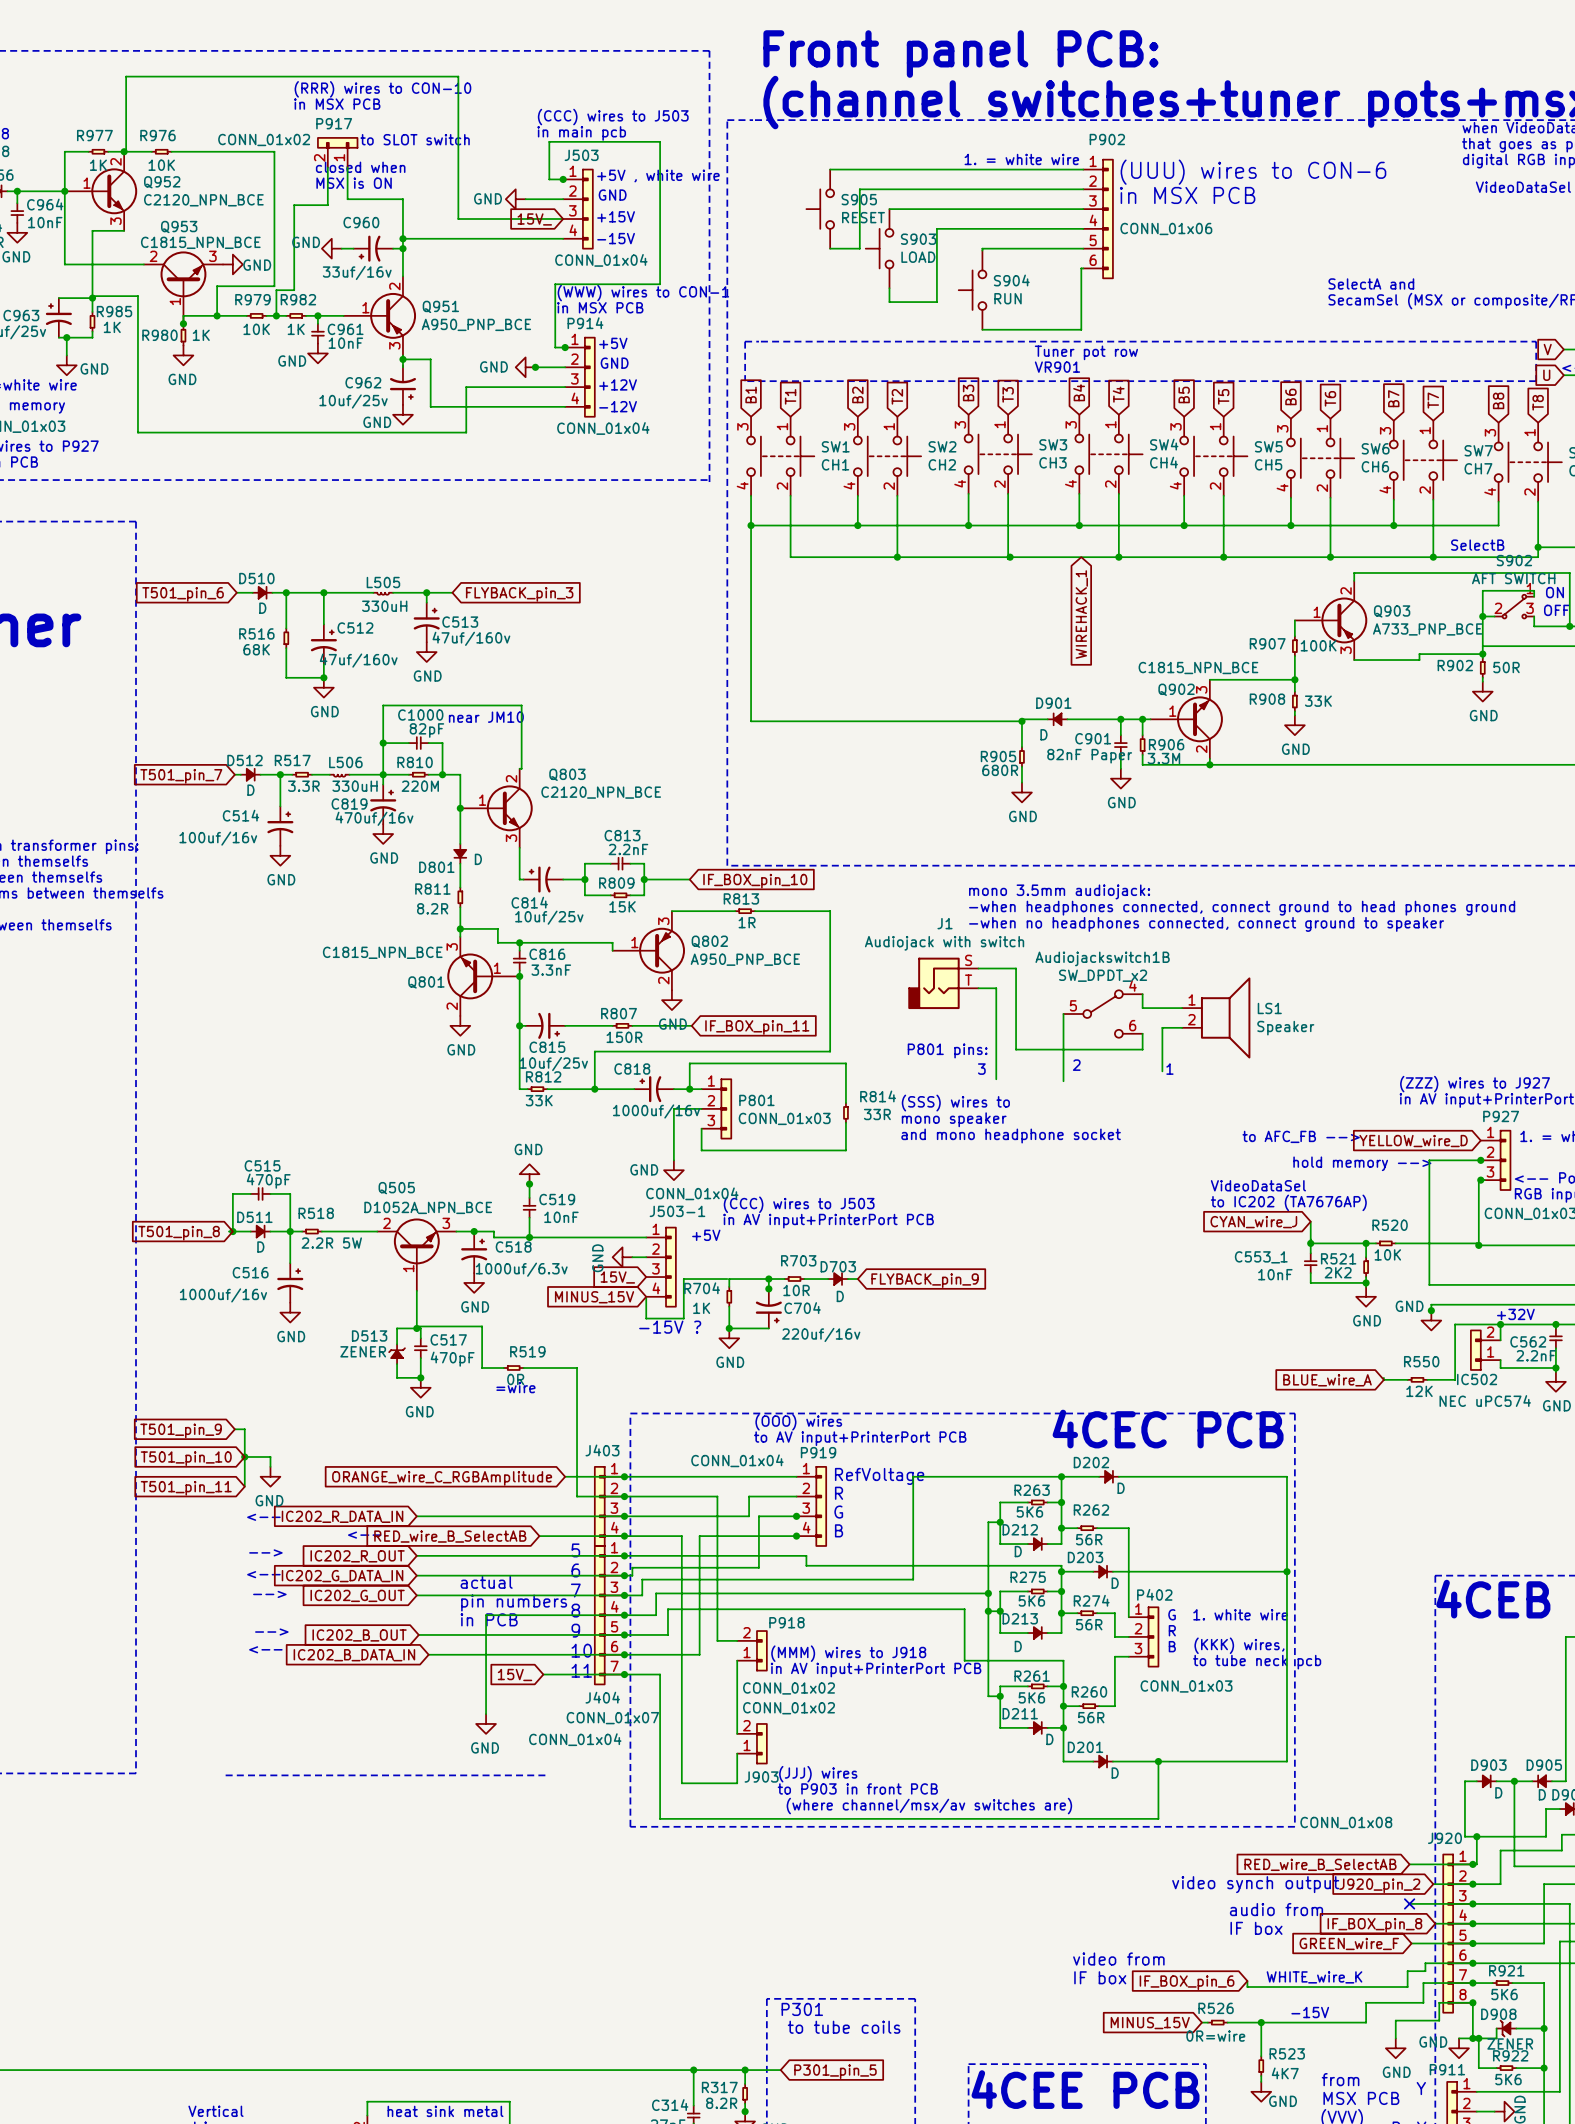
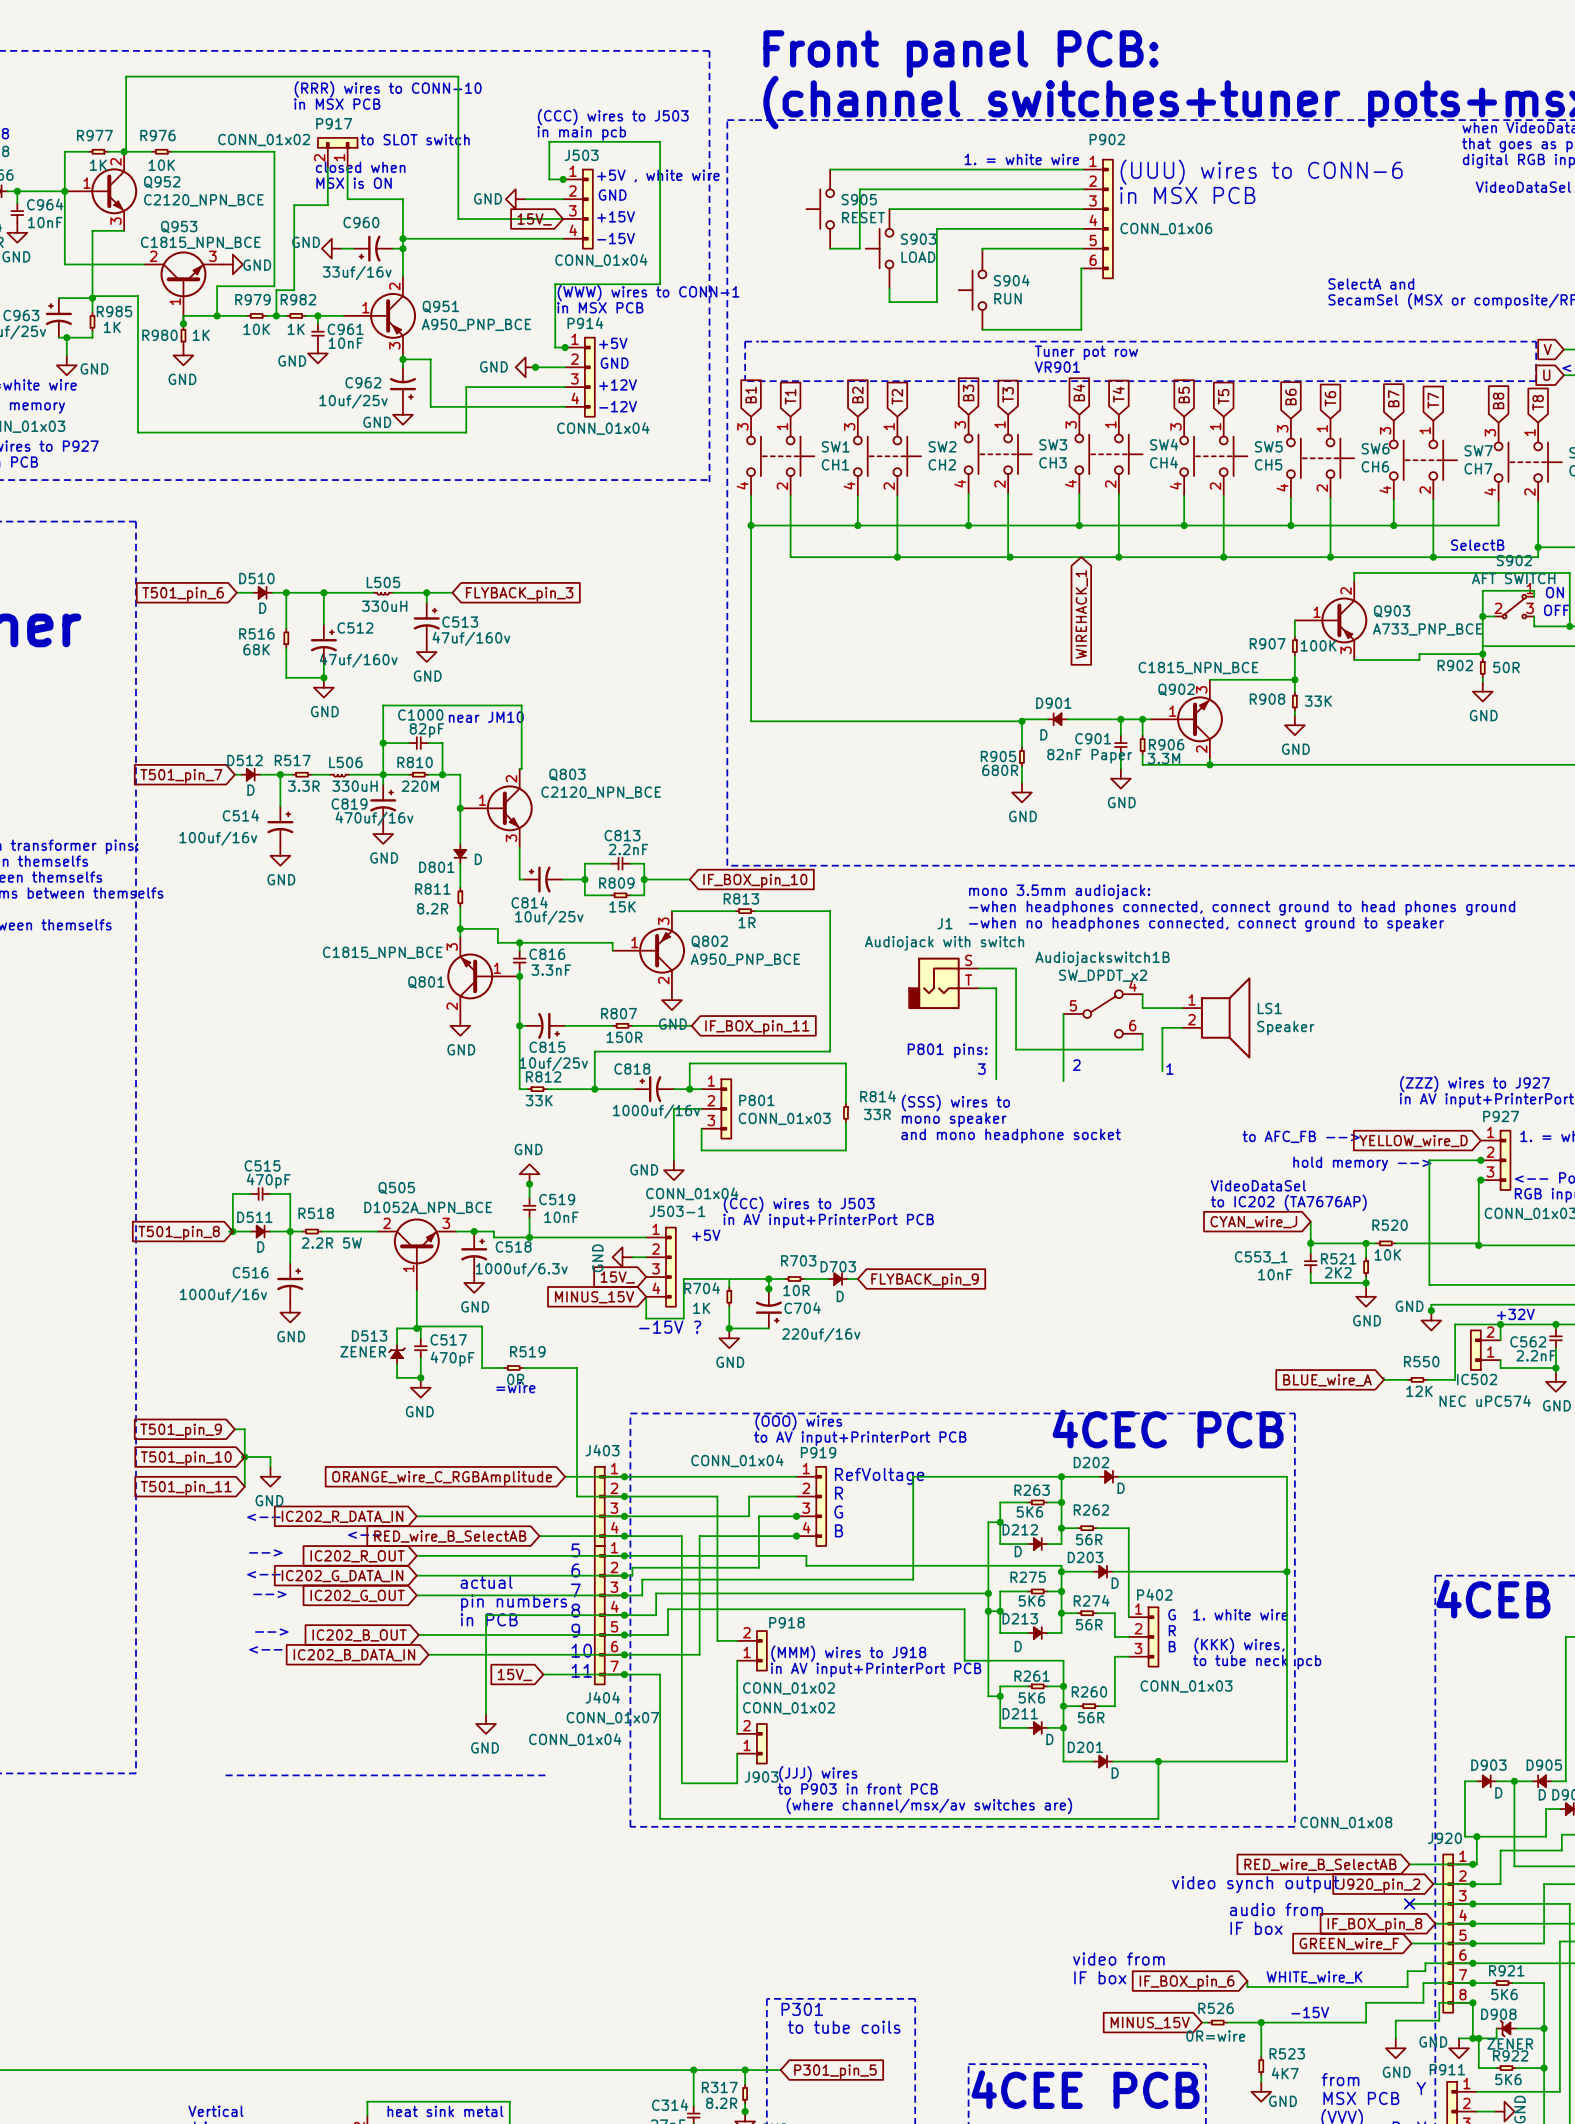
text: (RRR) wires to CON-10 (382, 89) -> (RRR) wires to CONN-10 (388, 89)
text: (UUU) wires to CON-6 (1253, 172) -> (UUU) wires to CONN-6 (1261, 172)
text: (WWW) wires to CON-1 (643, 293) -> (WWW) wires to CONN-1 (648, 293)

